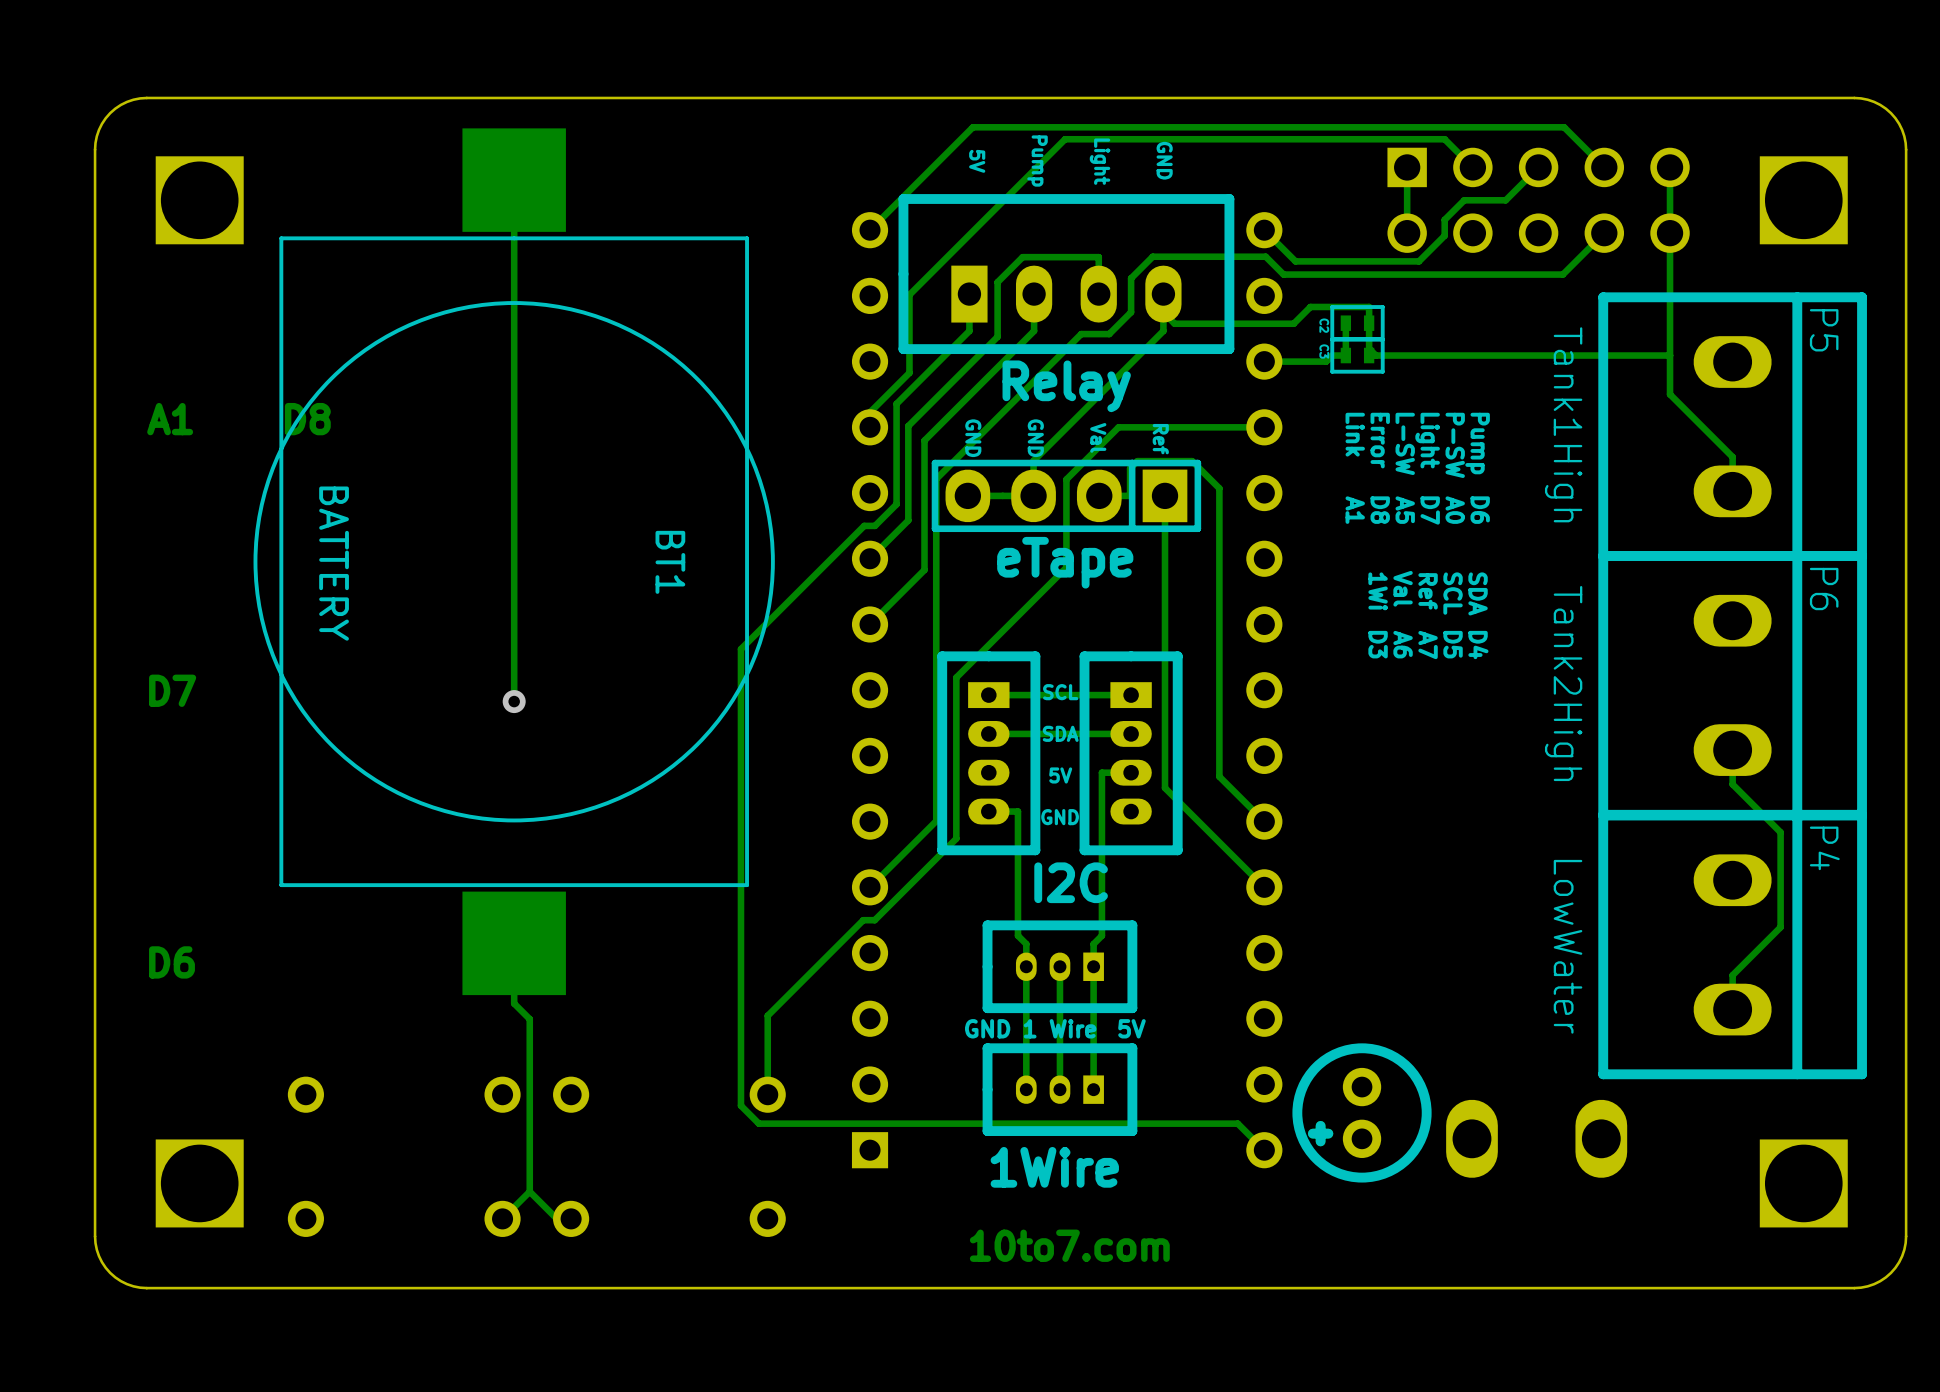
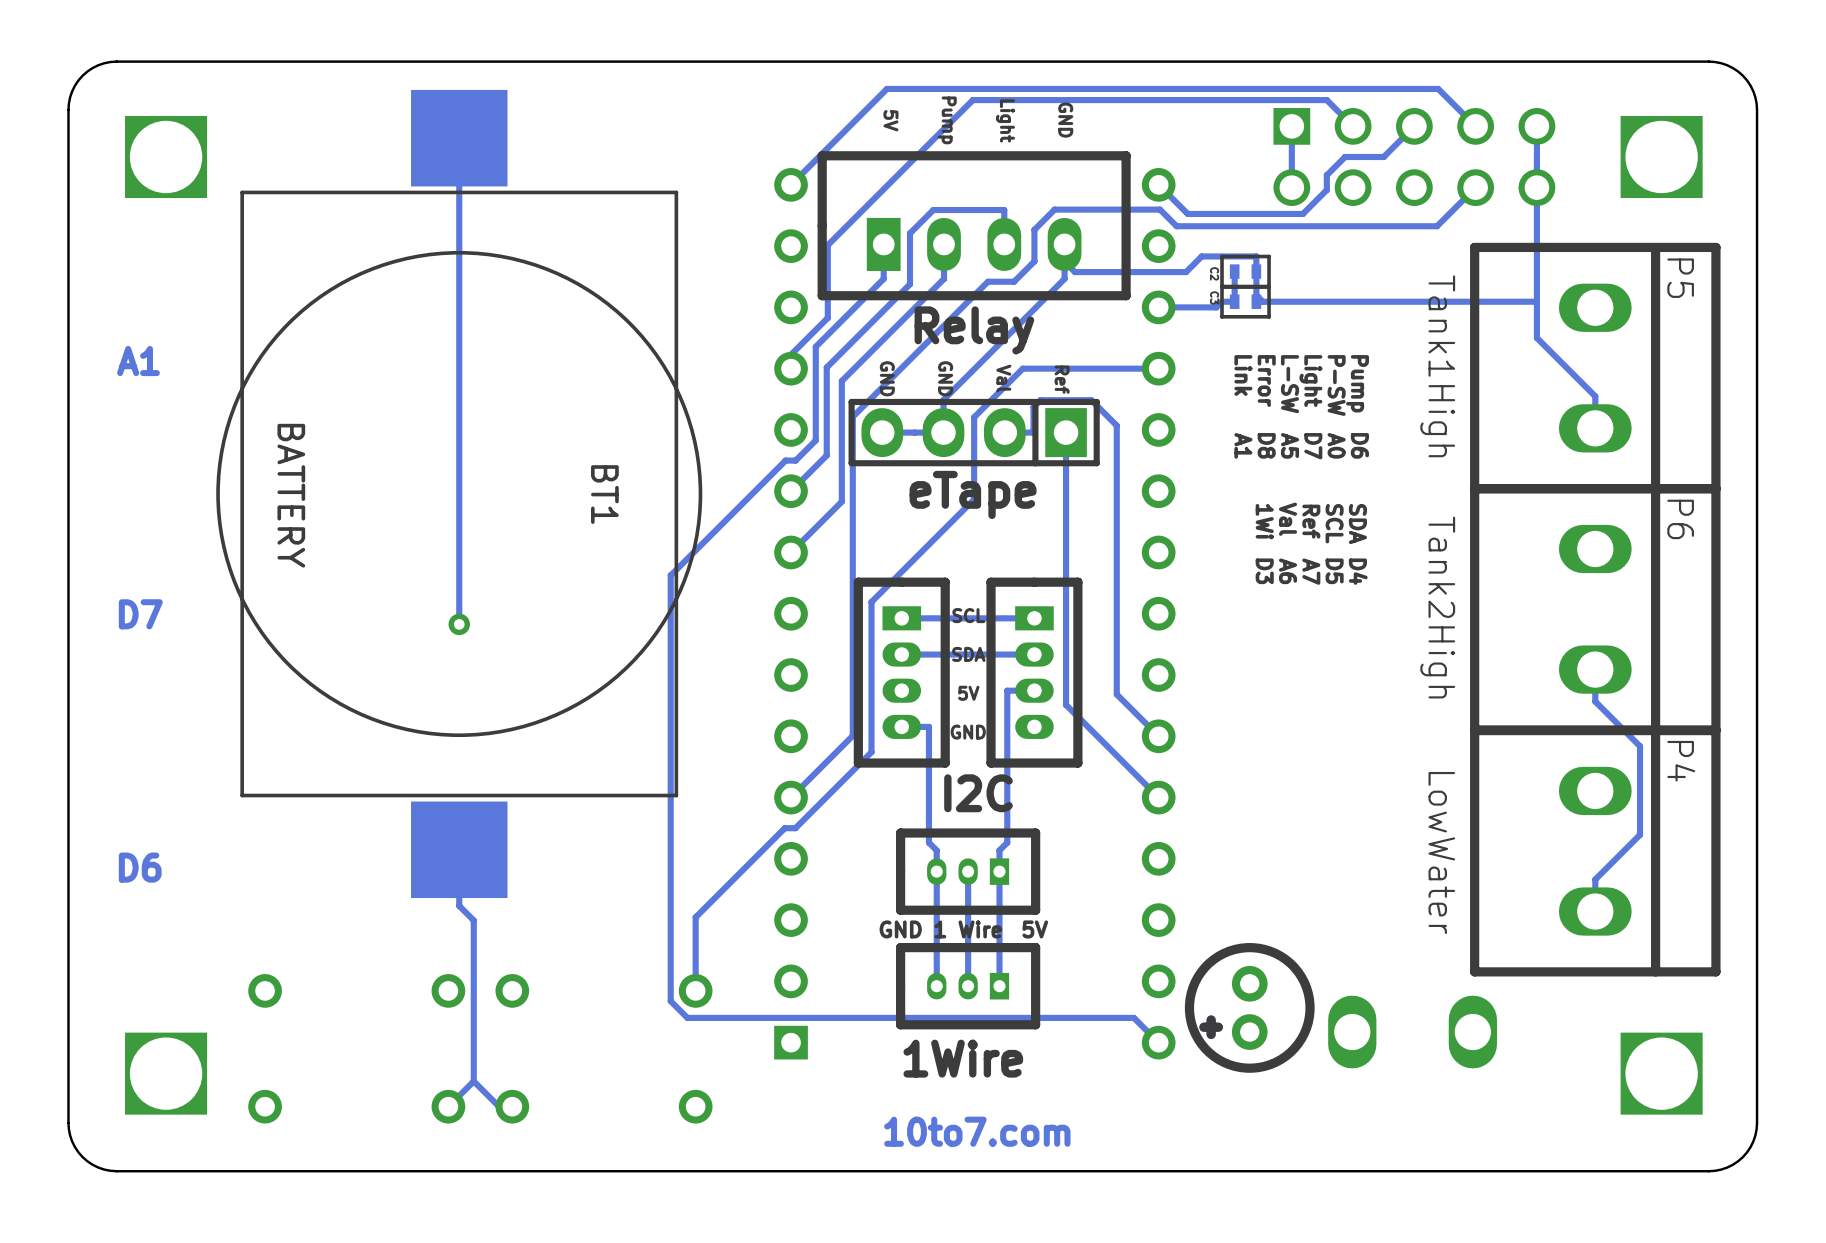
text: D8 (307, 419) -> none

